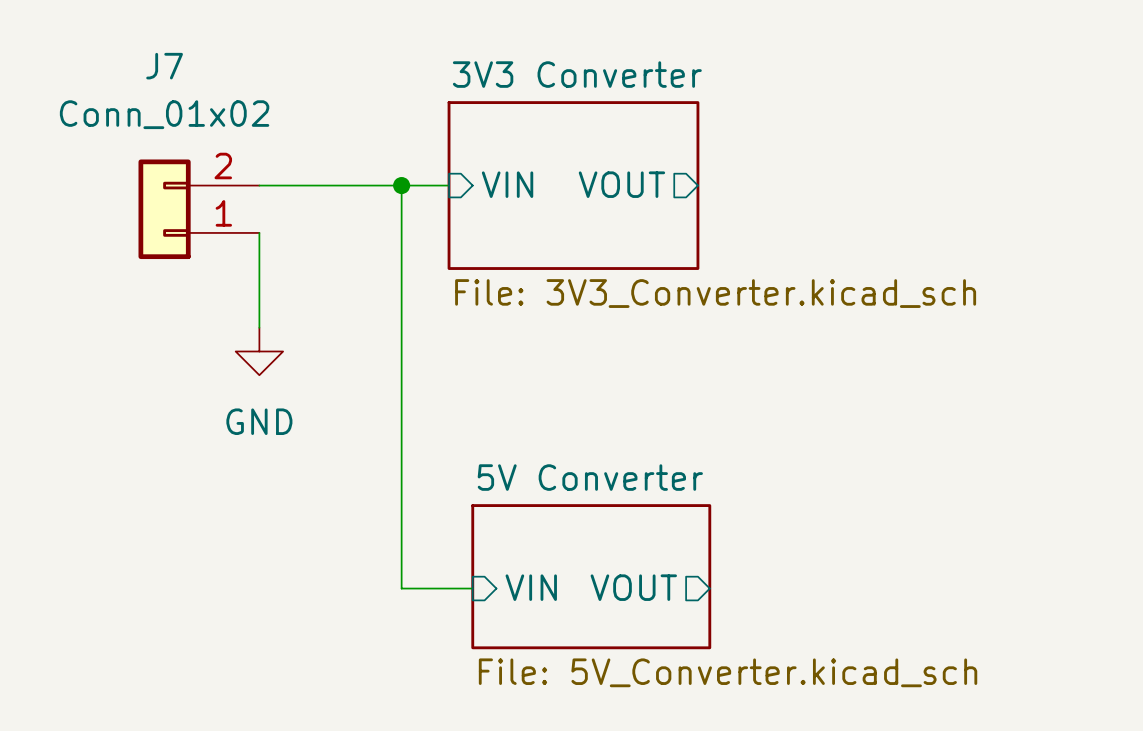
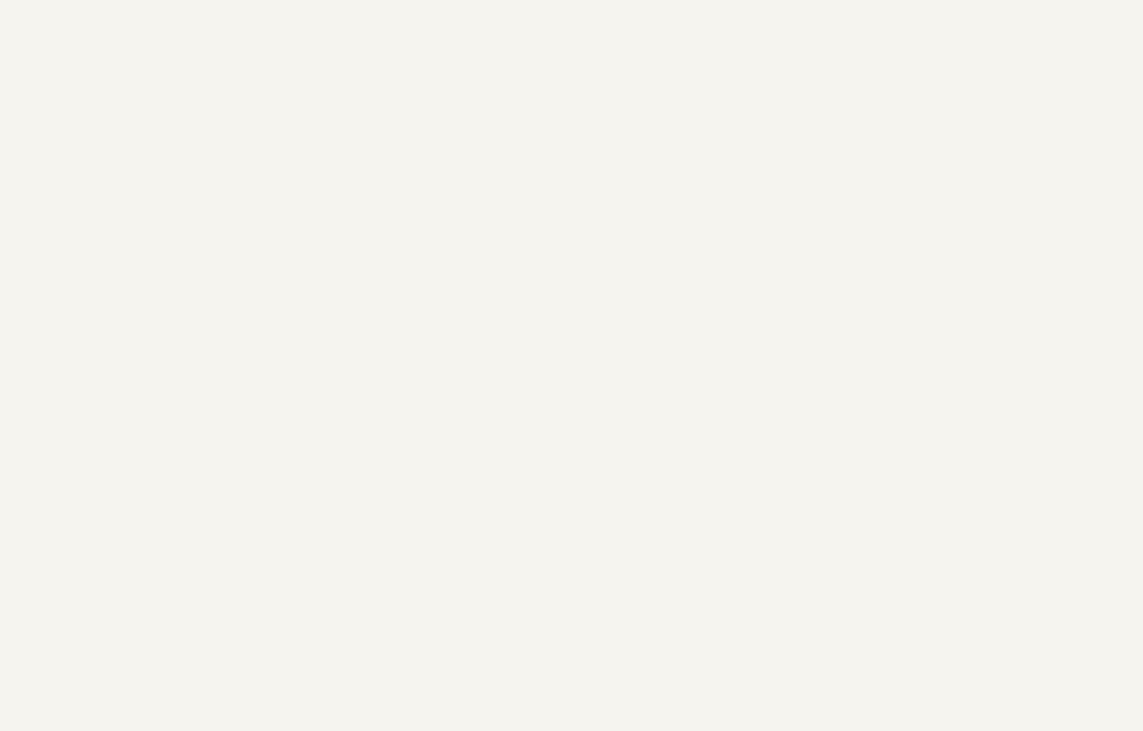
sheet pin: VIN (507, 184) -> none
sheet pin: VOUT (621, 184) -> none
wire: (259, 185) (449, 185) -> none
wire: (401, 185) (401, 588) (472, 588) -> none
junction: (401, 185) -> none
sheet 3V3 Converter: File: 3V3_Converter.kicad_sch (573, 185) -> none
J7: Conn_01x02 (198, 209) -> none
wire: (259, 232) (259, 327) -> none
power symbol: GND (259, 351) -> none
sheet 5V Converter: File: 5V_Converter.kicad_sch (591, 576) -> none
sheet pin: VIN (531, 587) -> none
sheet pin: VOUT (633, 587) -> none

